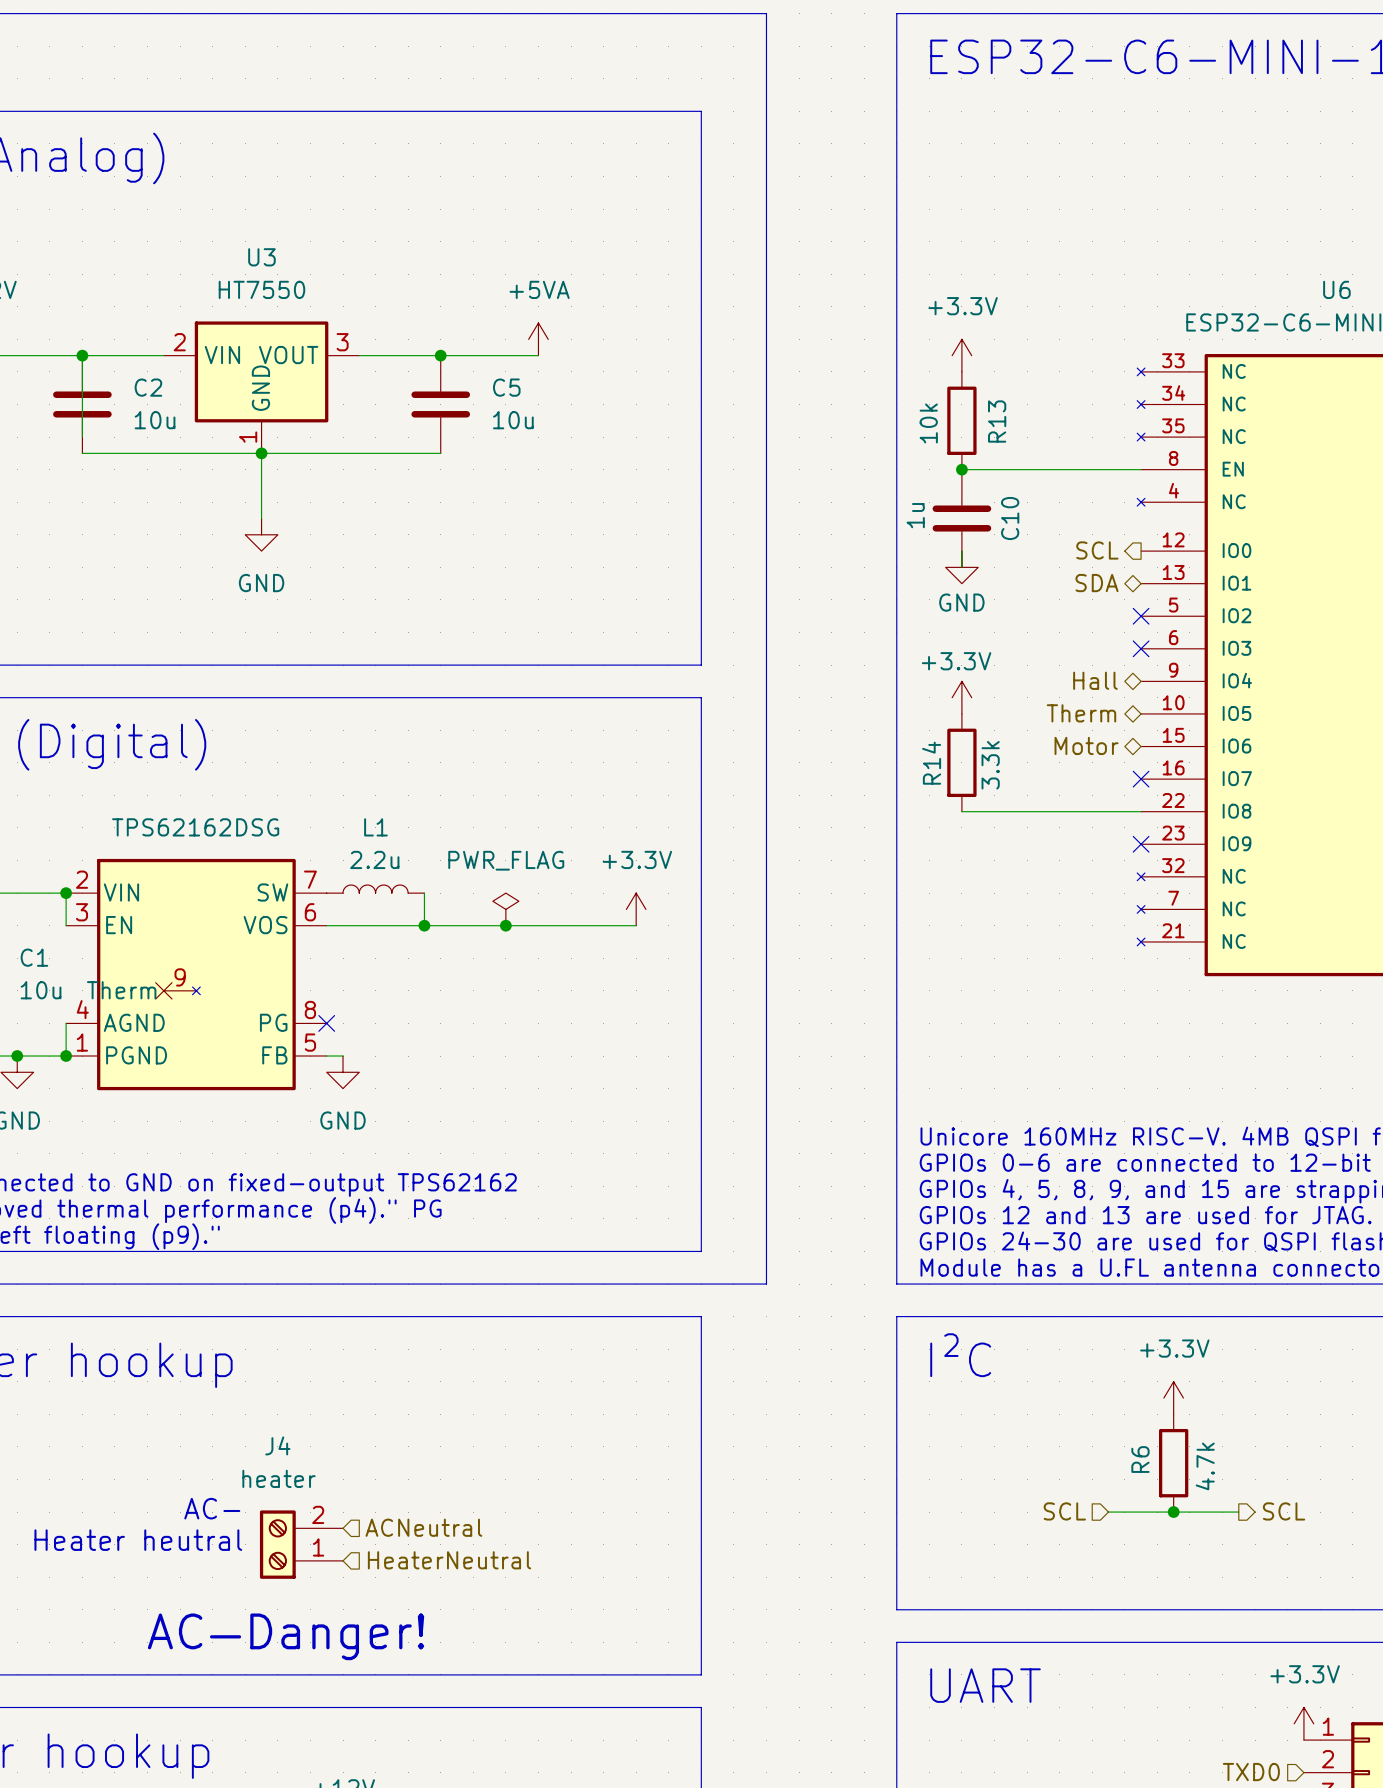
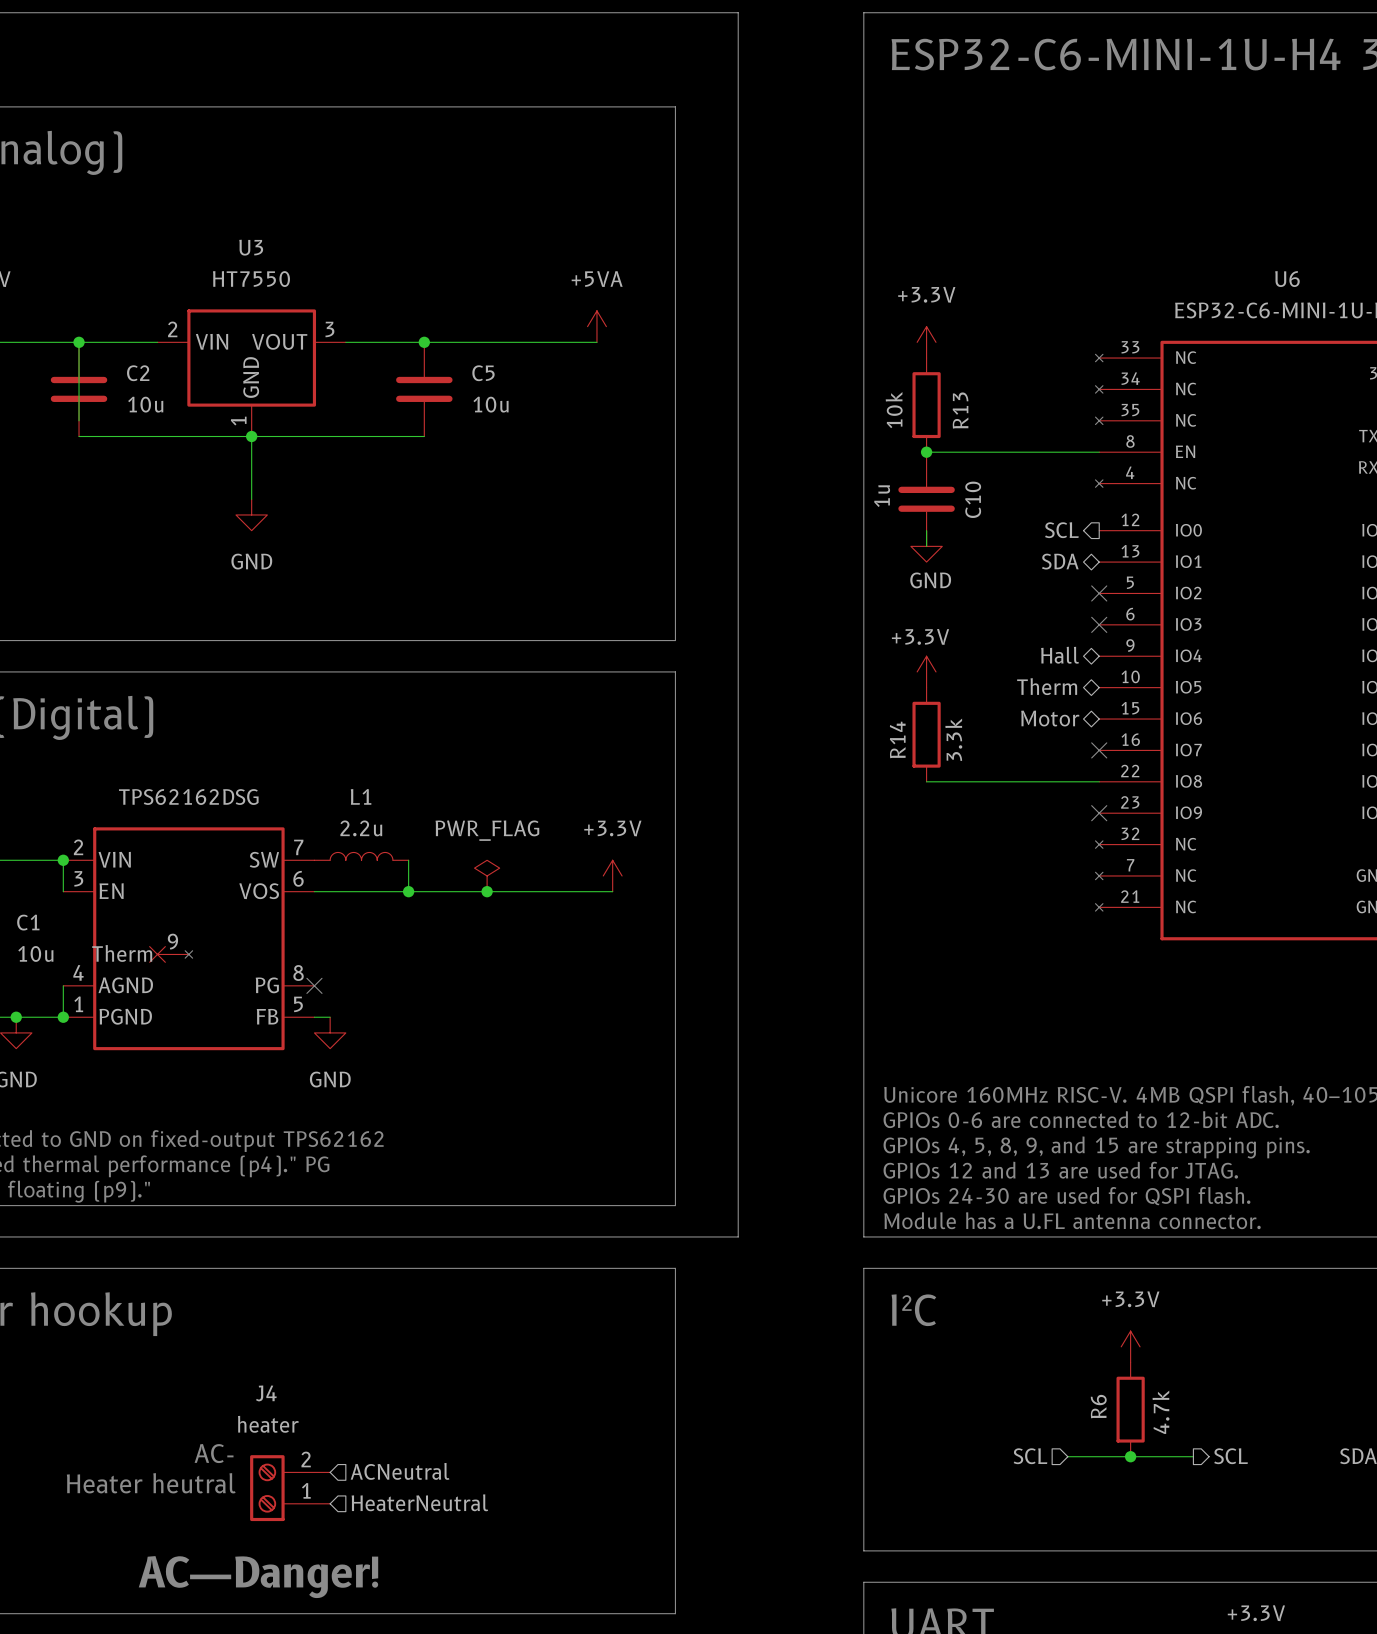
power symbol position: +5VA (538, 339) -> +5VA (596, 326)
wire: none -> (518, 342) (596, 342)

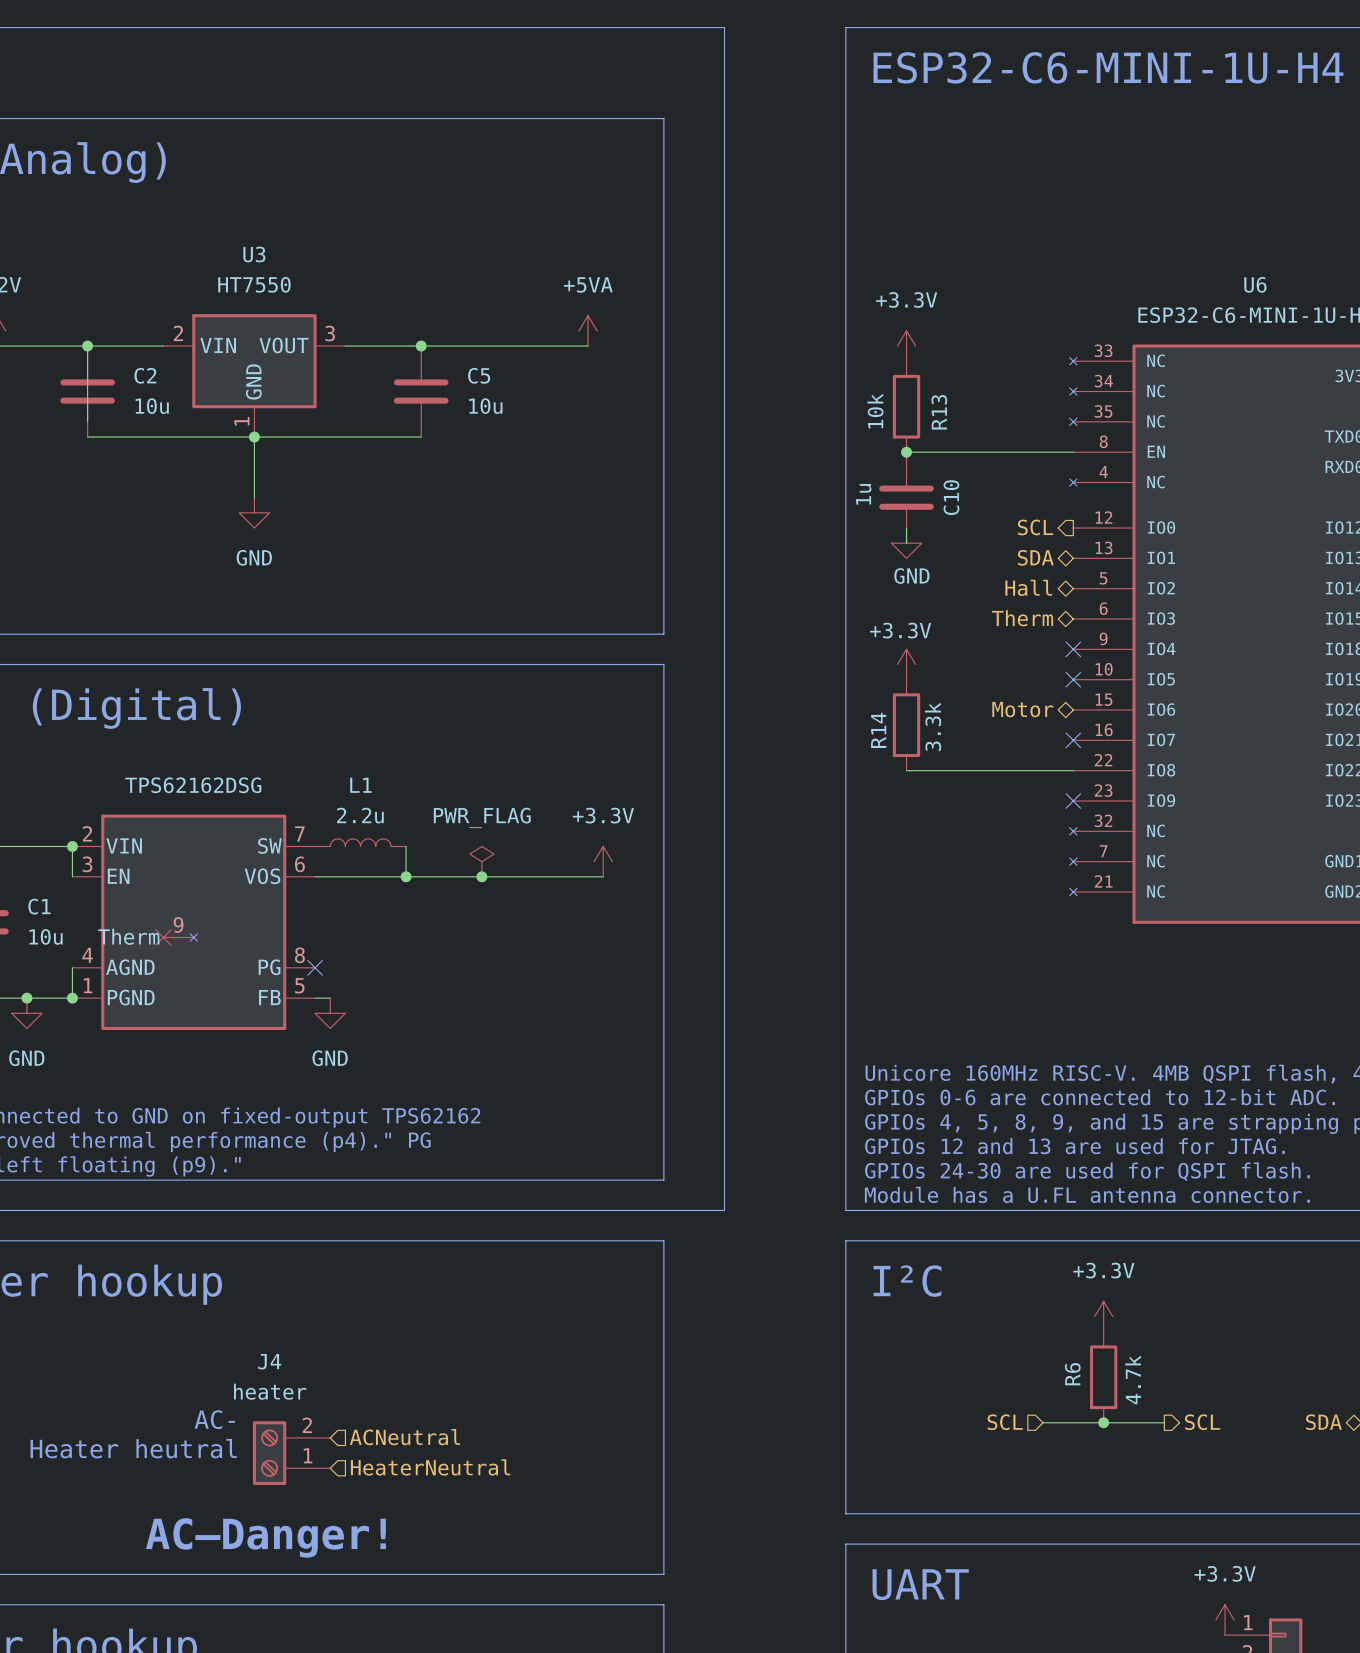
no-connect mark: (1099, 593) -> none
no-connect mark: (1099, 624) -> none
hierarchical label position: Hall (1060, 655) -> Hall (1028, 587)
no-connect mark: none -> (1073, 649)
hierarchical label position: Therm (1047, 686) -> Therm (1022, 618)
no-connect mark: none -> (1073, 679)

